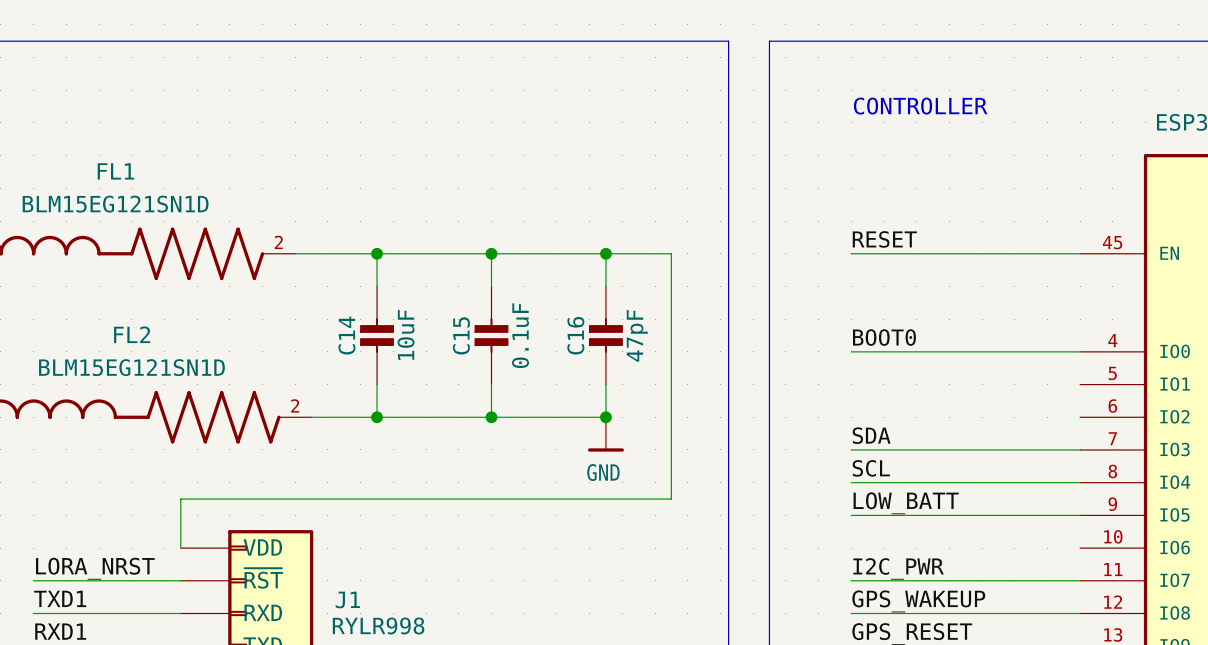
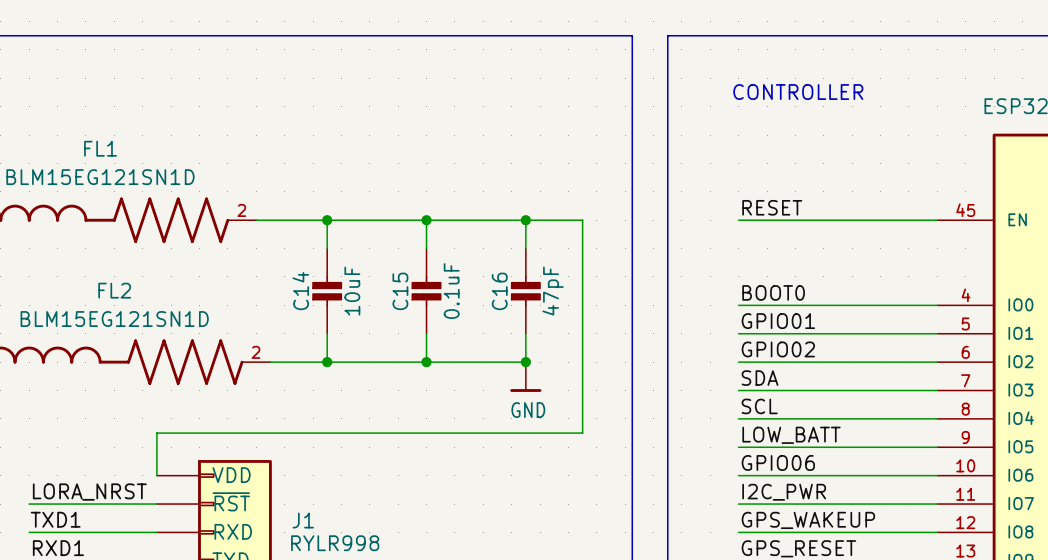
label: none -> GPIO01 (778, 321)
wire: none -> (738, 333) (937, 333)
label: none -> GPIO02 (778, 349)
wire: none -> (738, 362) (937, 362)
label: none -> GPIO06 (778, 462)
wire: none -> (738, 475) (937, 475)

